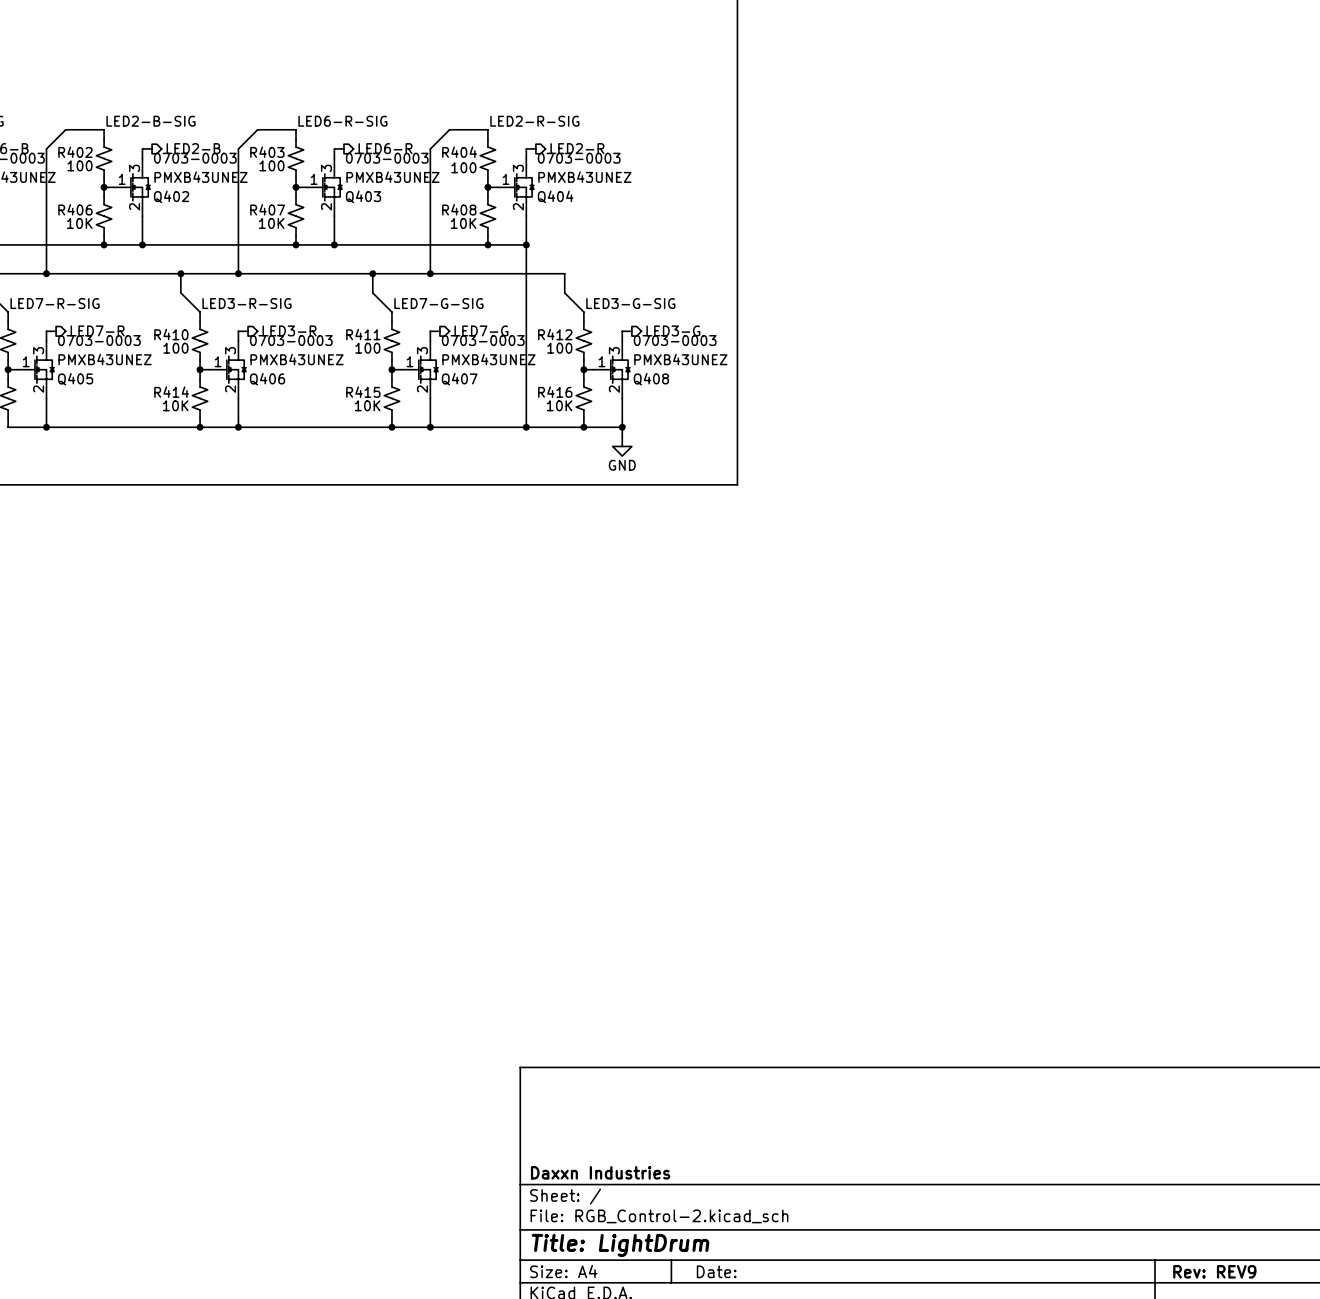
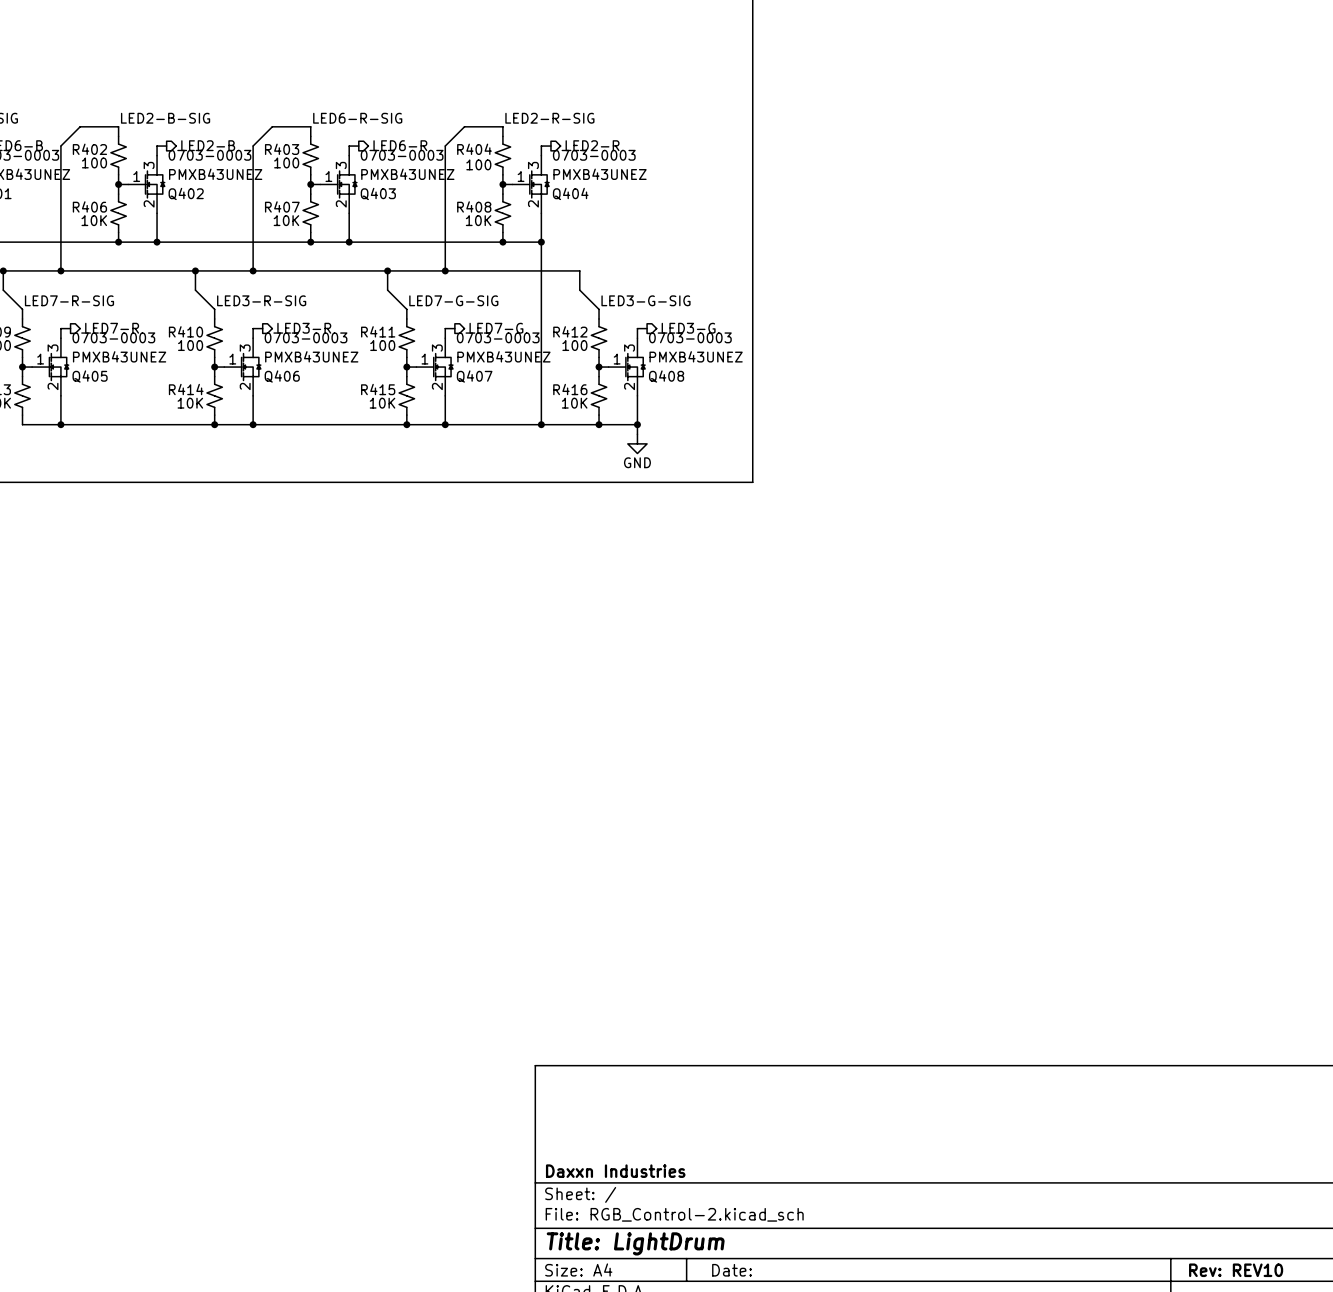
title block: Rev: REV9 (1214, 1271) -> Rev: REV10 (1236, 1270)

